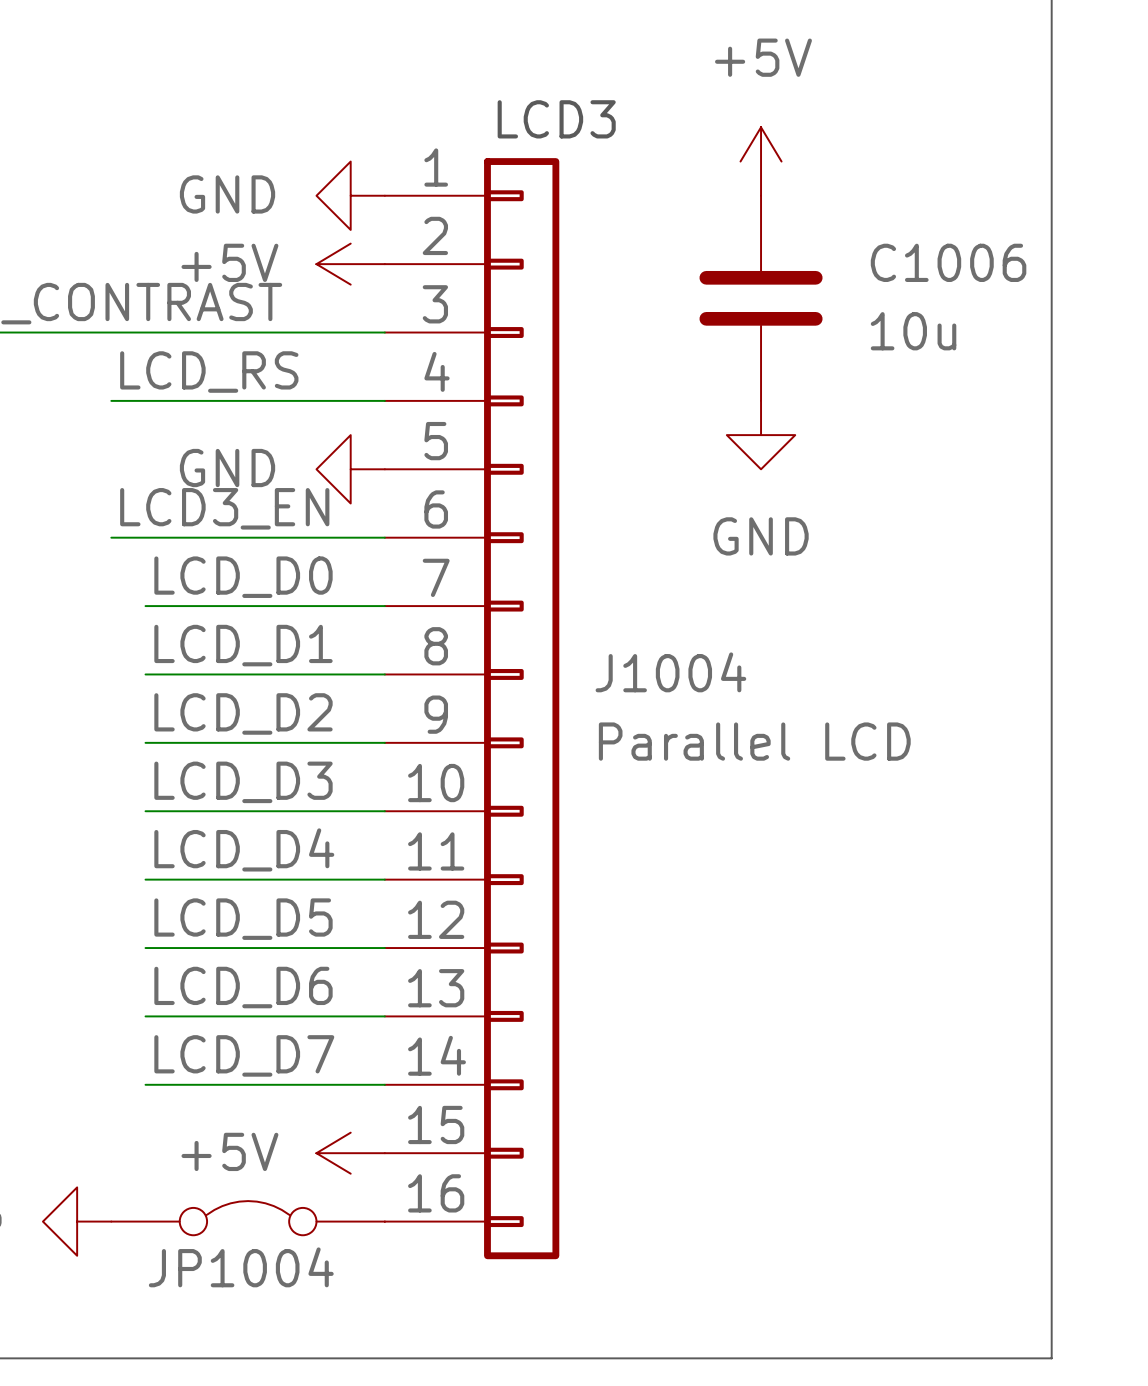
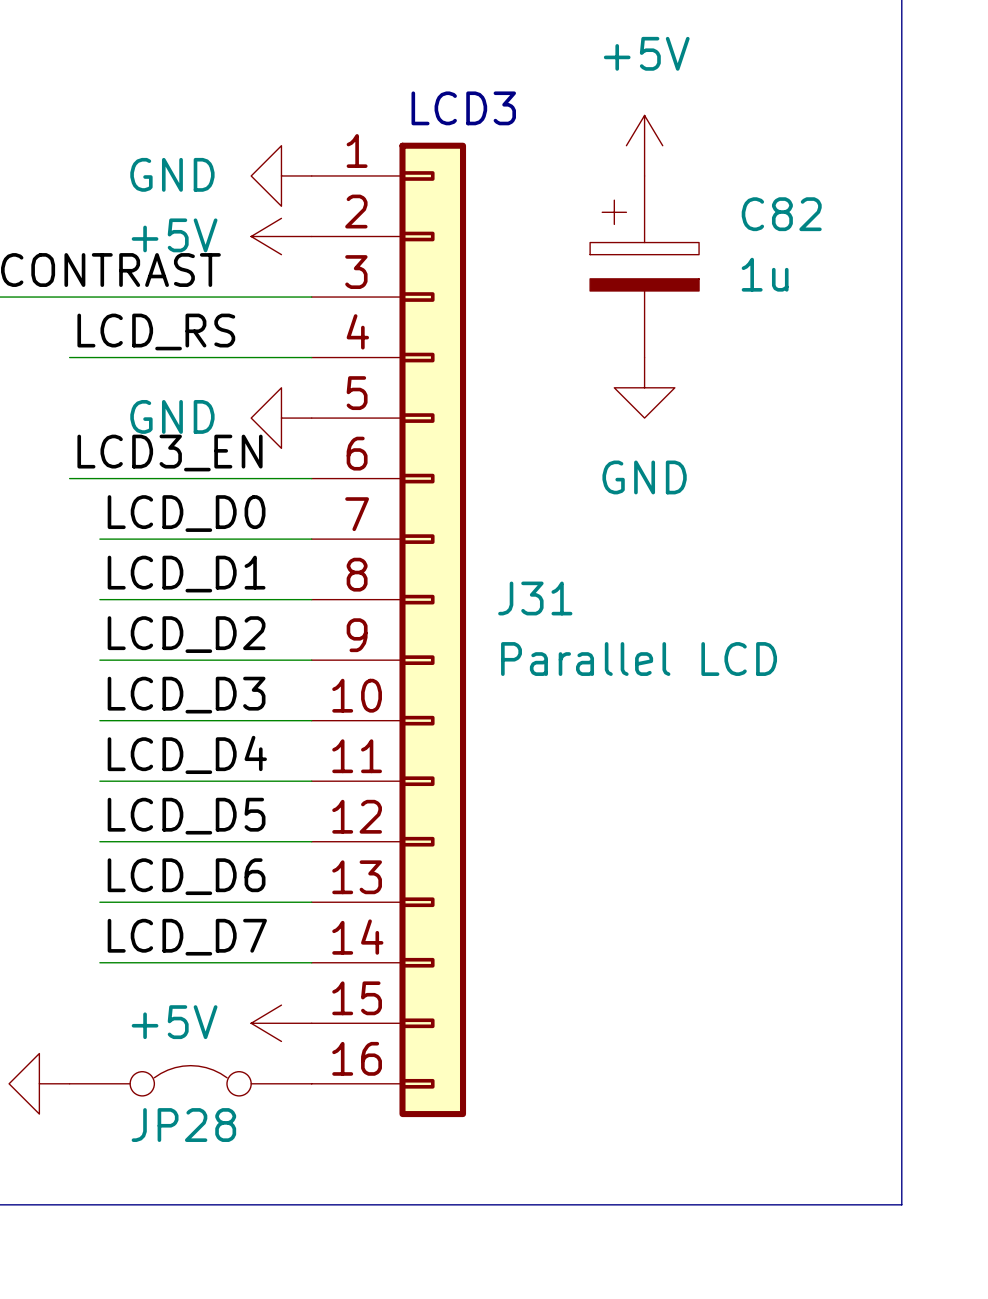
C1006: 10u (761, 298) -> none
C82: none -> 1u (644, 266)
J1004 name: J1004 (670, 672) -> J31 (535, 598)
JP1004 name: JP1004 (241, 1267) -> JP28 (183, 1125)

